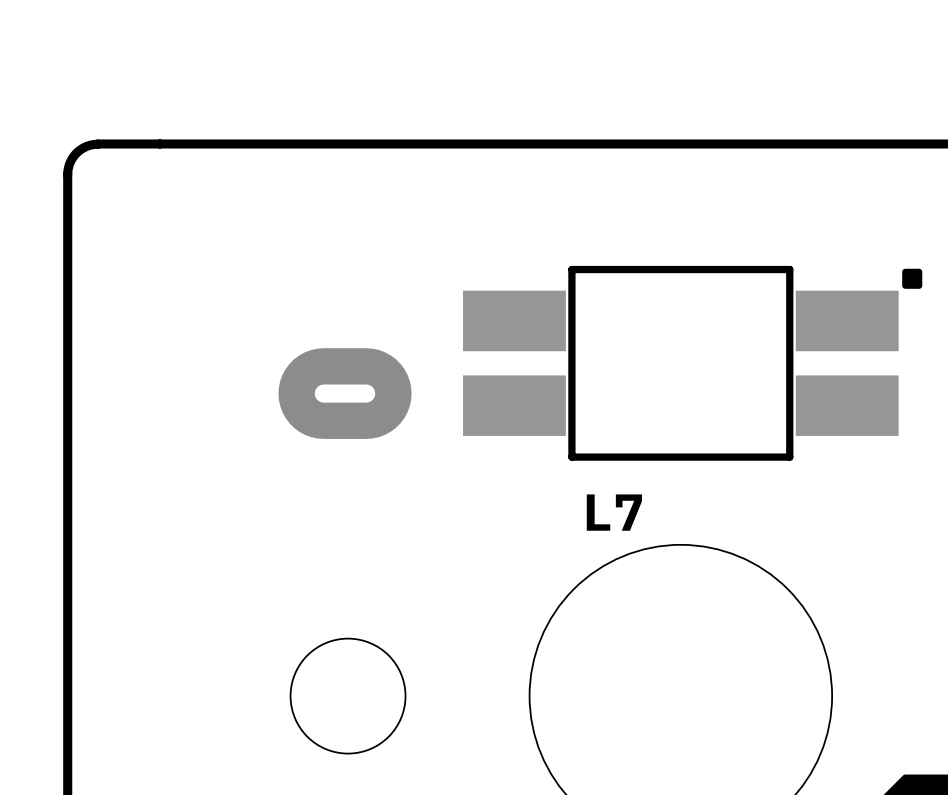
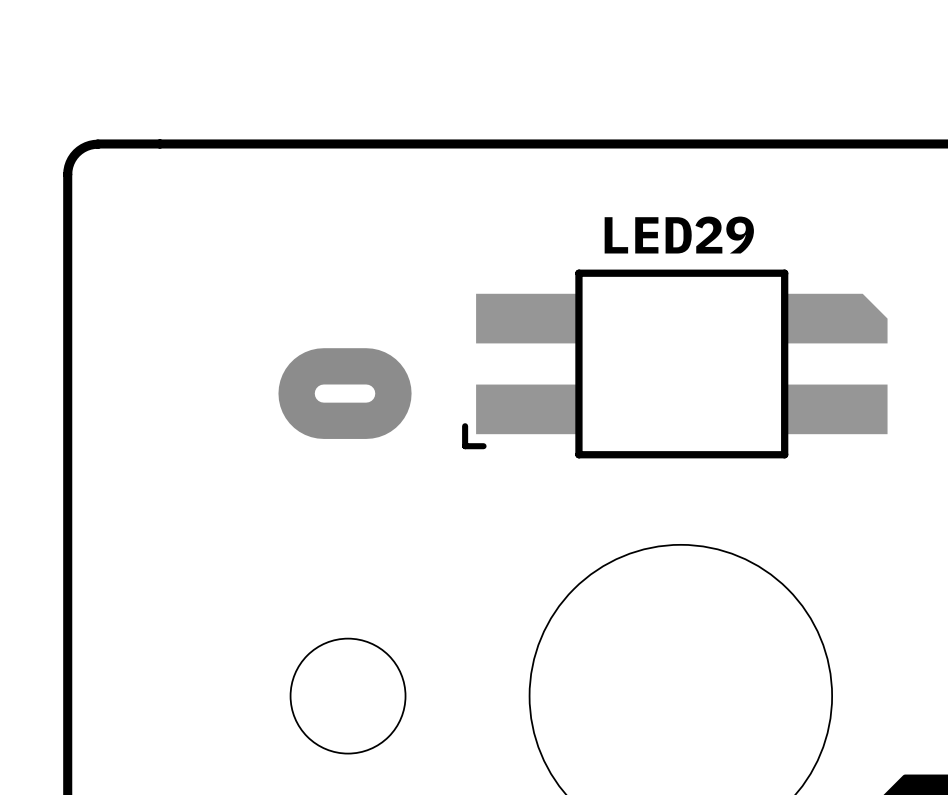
LED29: none -> (674, 363)
L7: (692, 363) -> none

